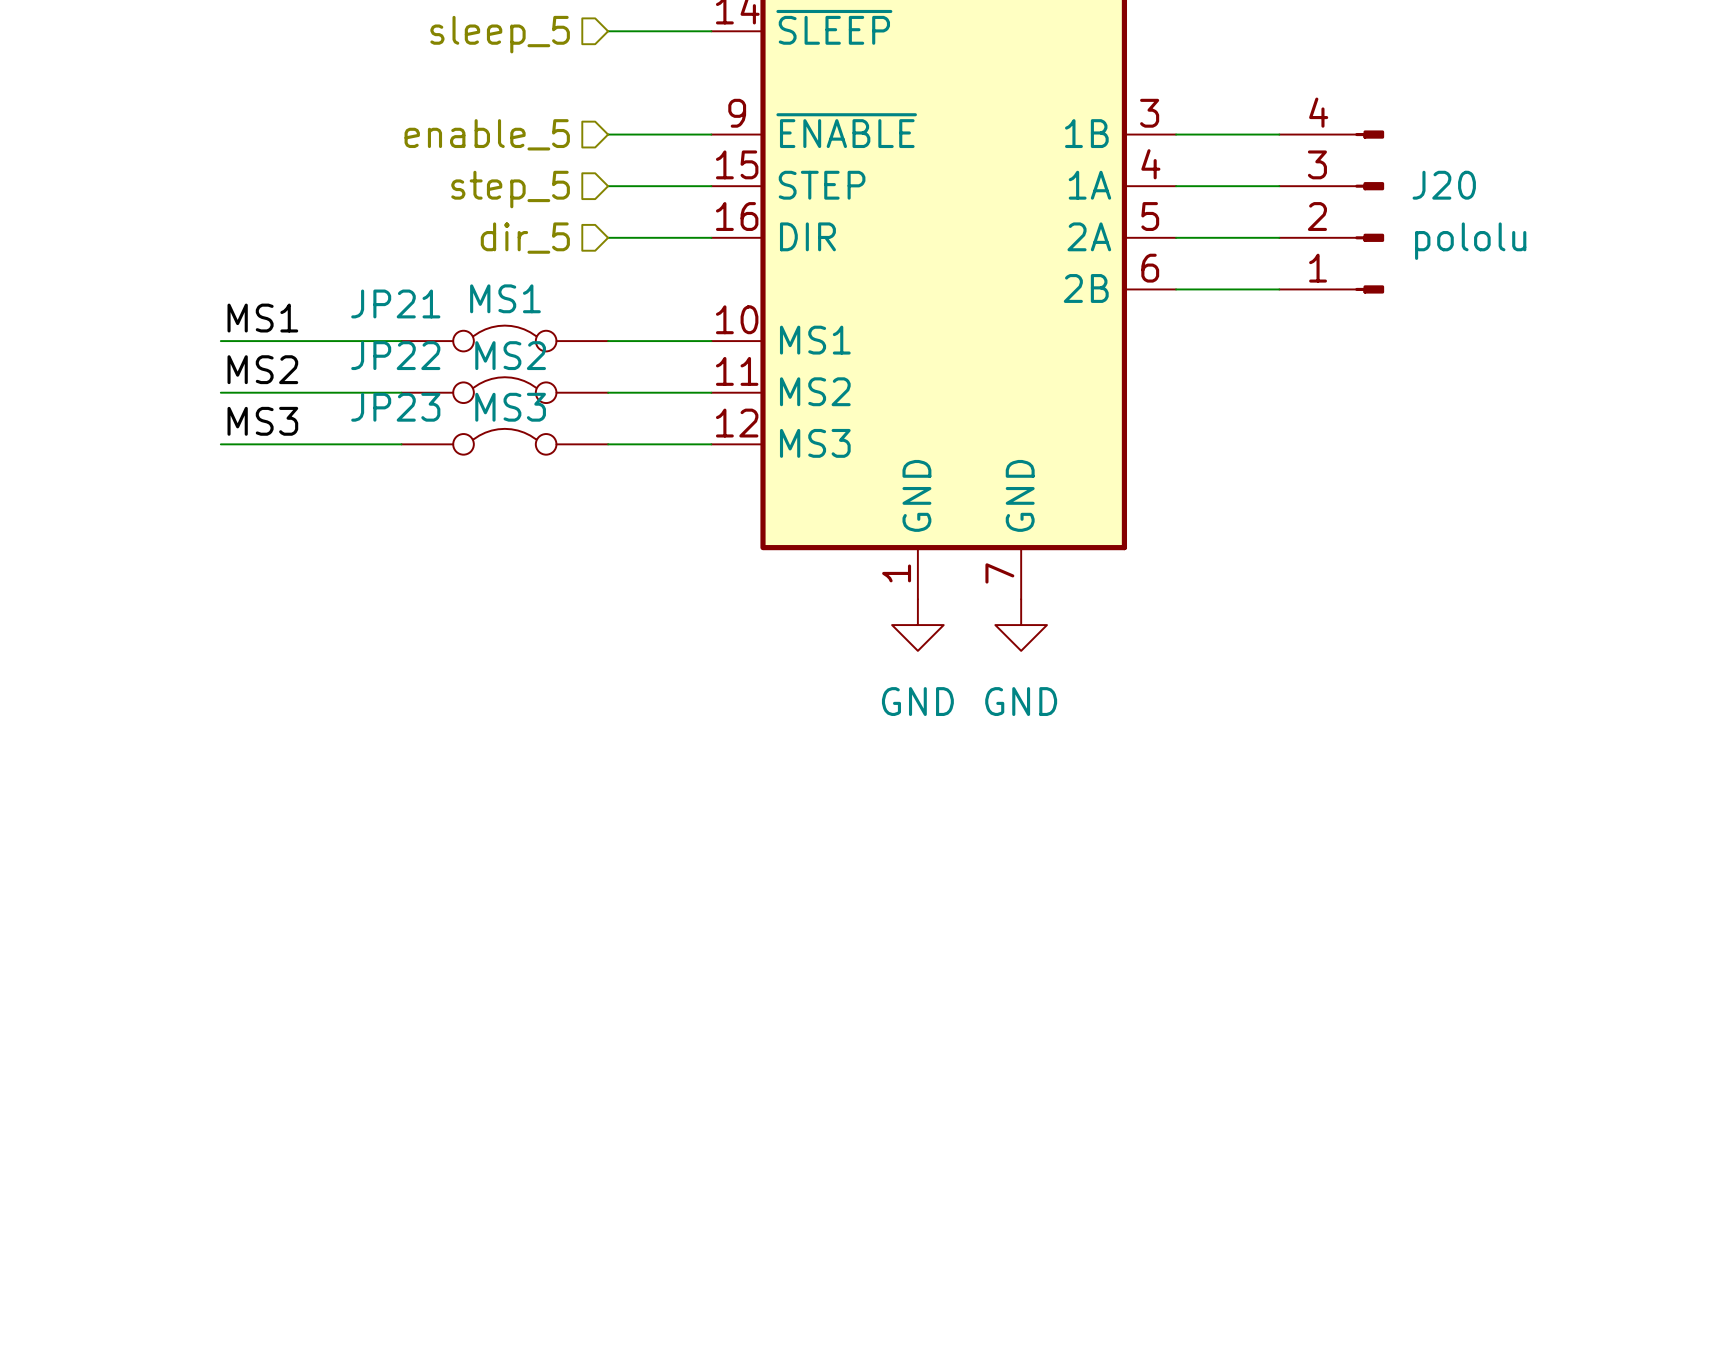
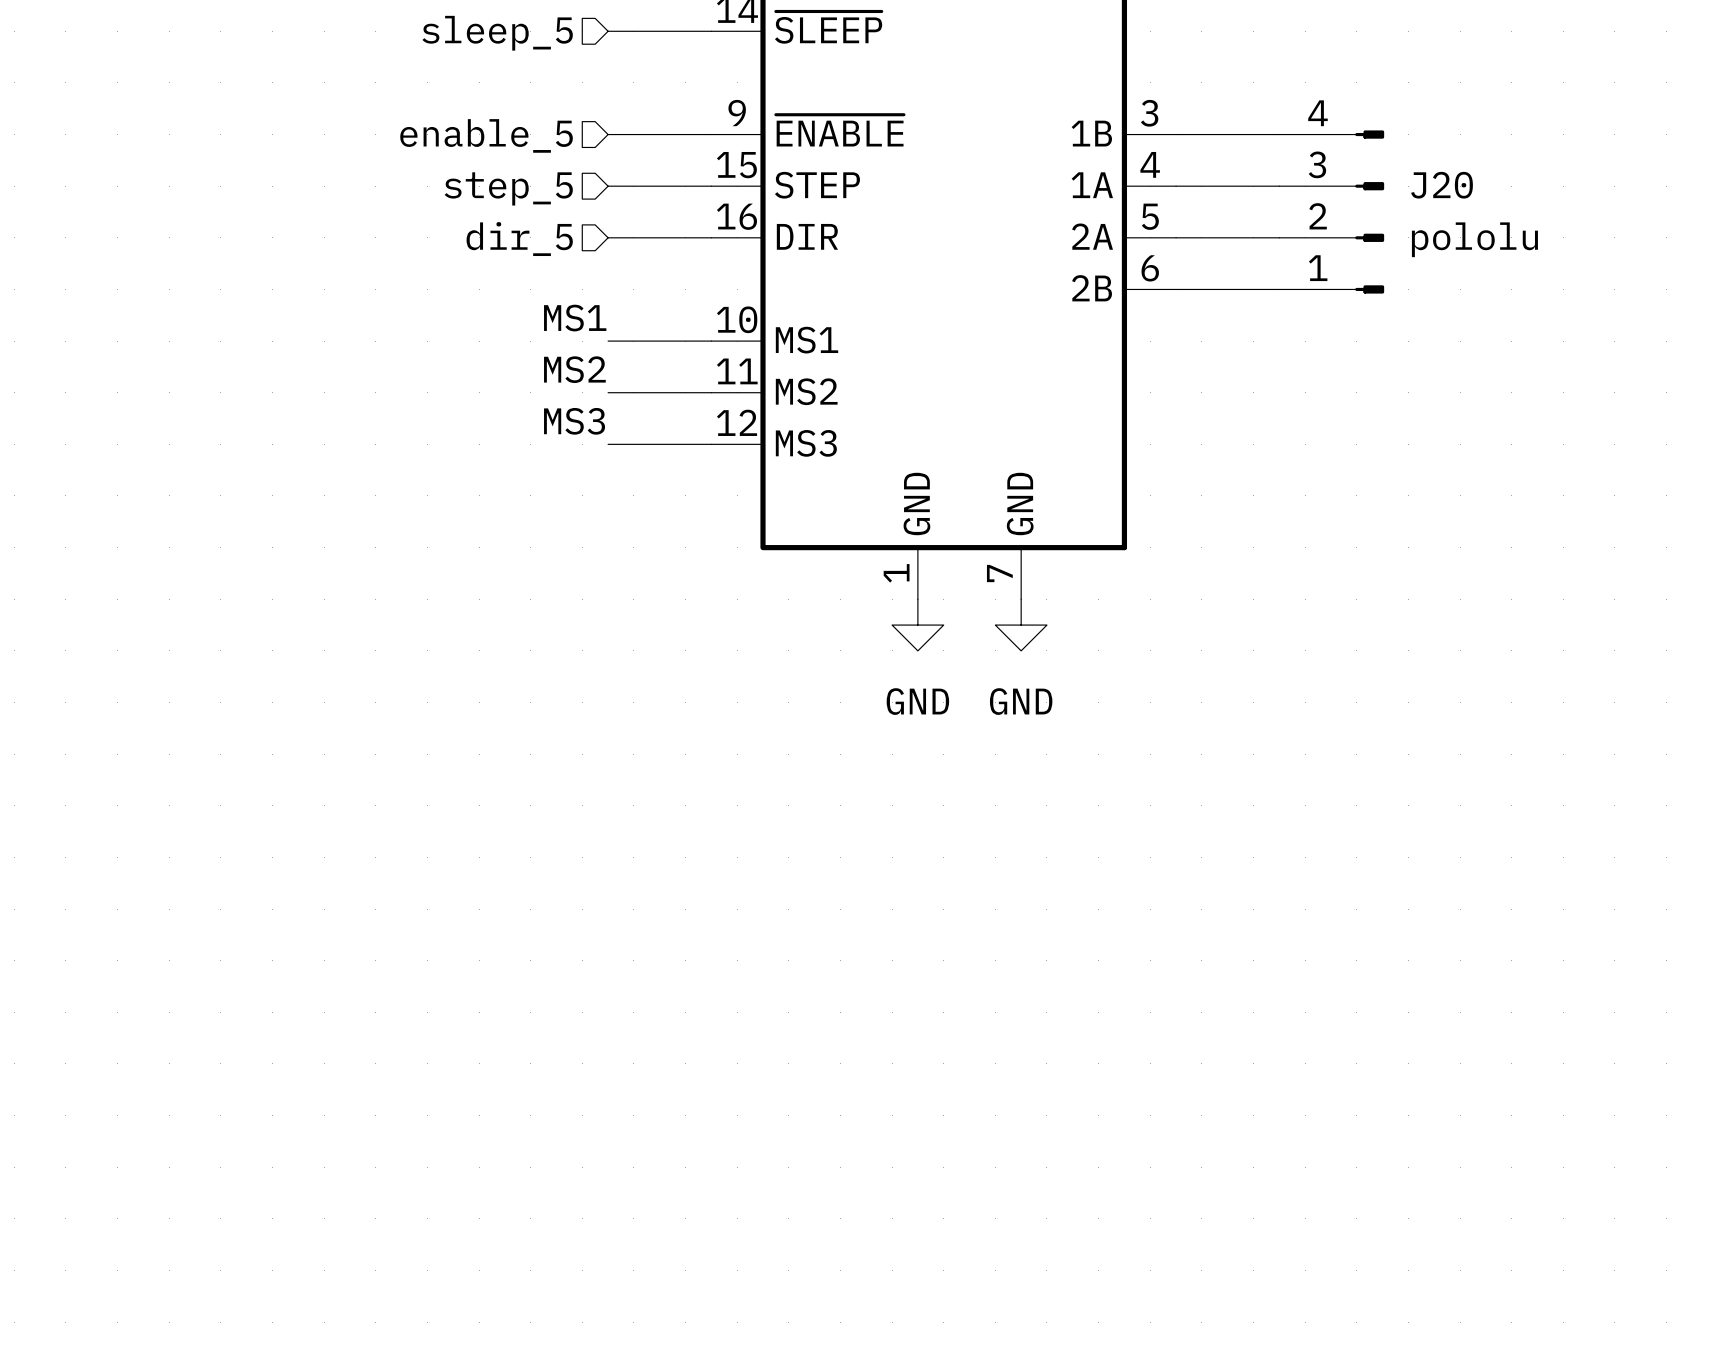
label position: MS1 (262, 318) -> MS1 (575, 318)
JP21: MS1 (504, 338) -> none
wire: (220, 341) (401, 341) -> none
label position: MS2 (262, 369) -> MS2 (574, 369)
JP22: MS2 (504, 390) -> none
wire: (220, 392) (401, 392) -> none
label position: MS3 (262, 421) -> MS3 (574, 421)
JP23: MS3 (504, 441) -> none
wire: (220, 444) (401, 444) -> none

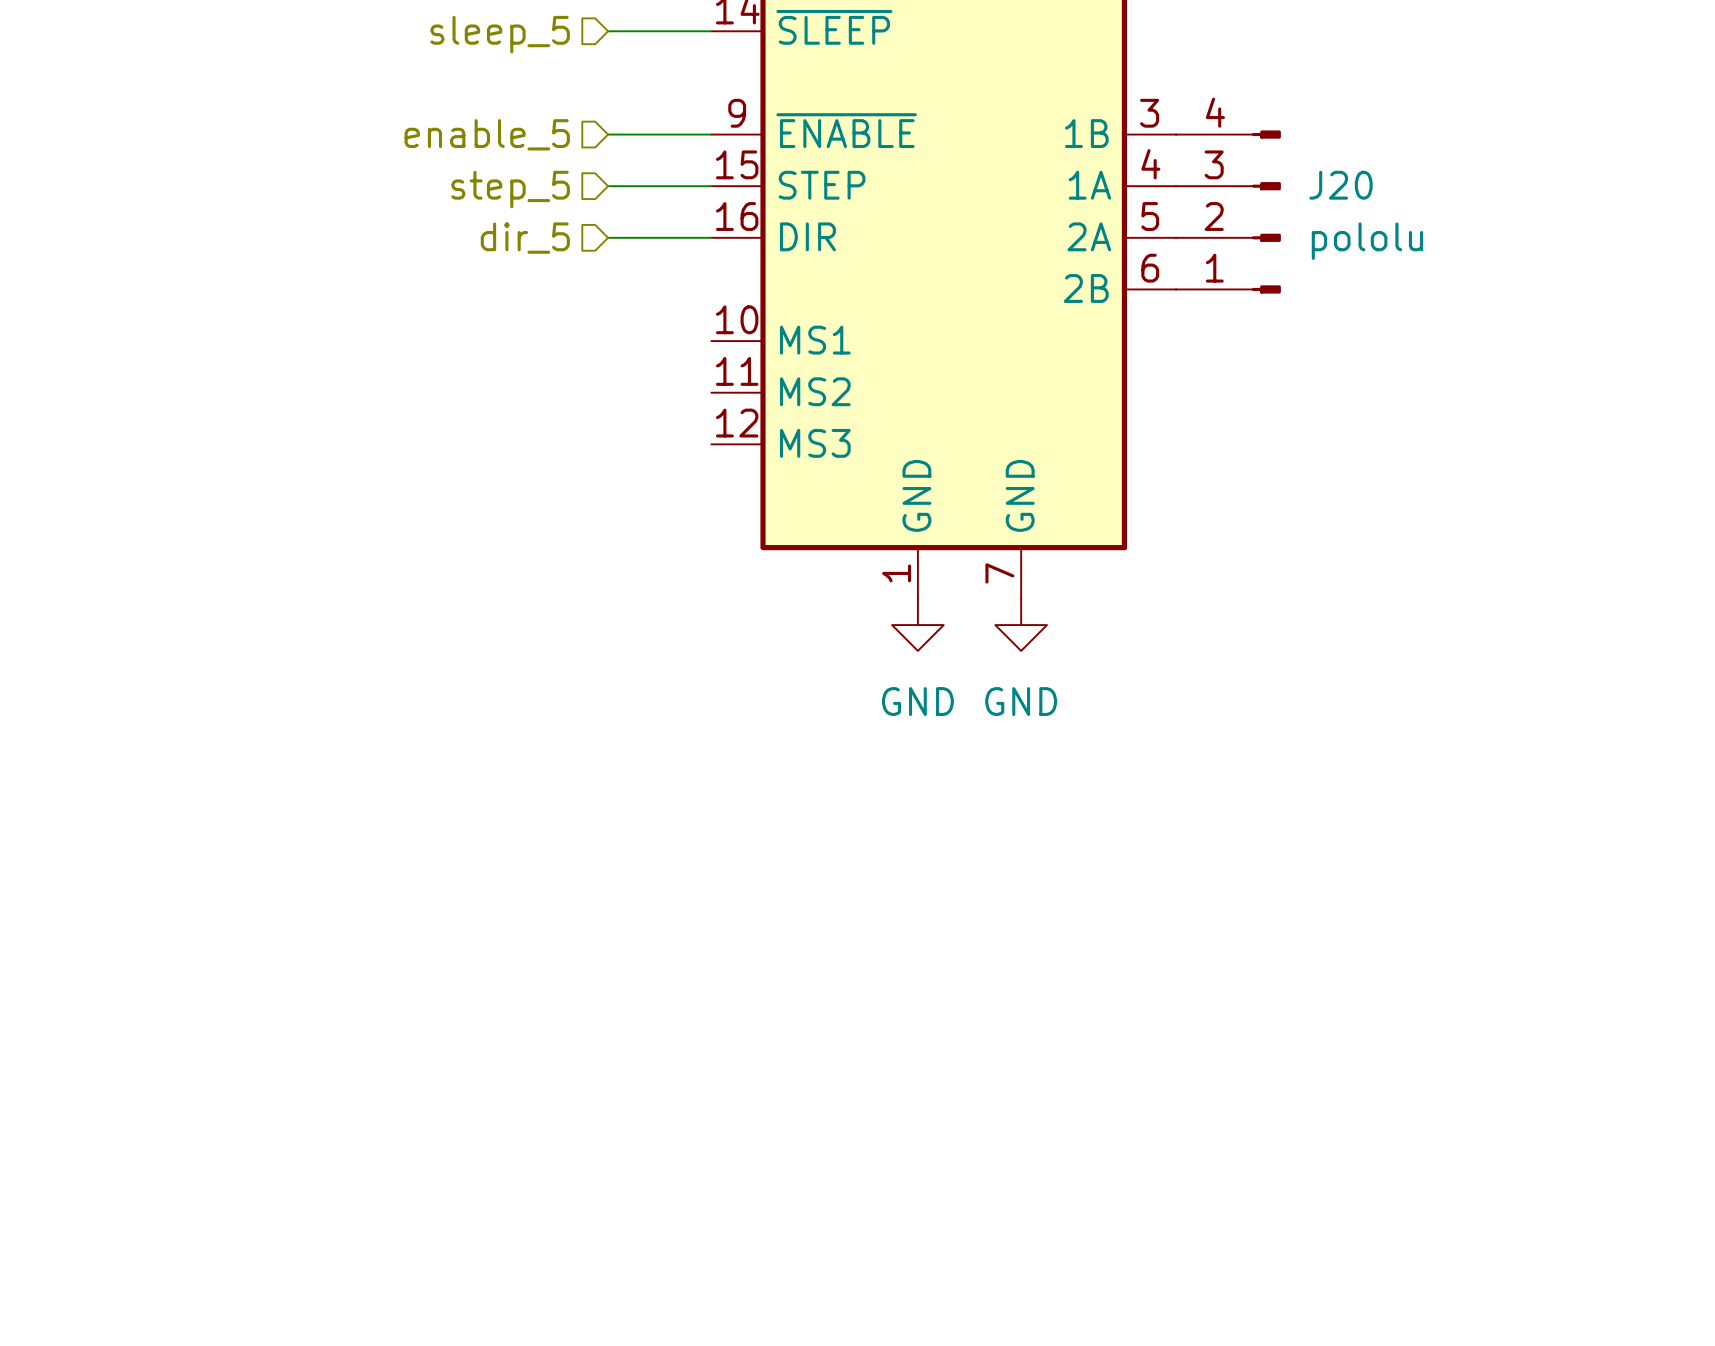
J20 position: (1331, 212) -> (1228, 212)
label: MS1 (575, 318) -> none
wire: (608, 341) (711, 341) -> none
label: MS2 (574, 369) -> none
wire: (608, 392) (711, 392) -> none
label: MS3 (574, 421) -> none
wire: (608, 444) (711, 444) -> none

